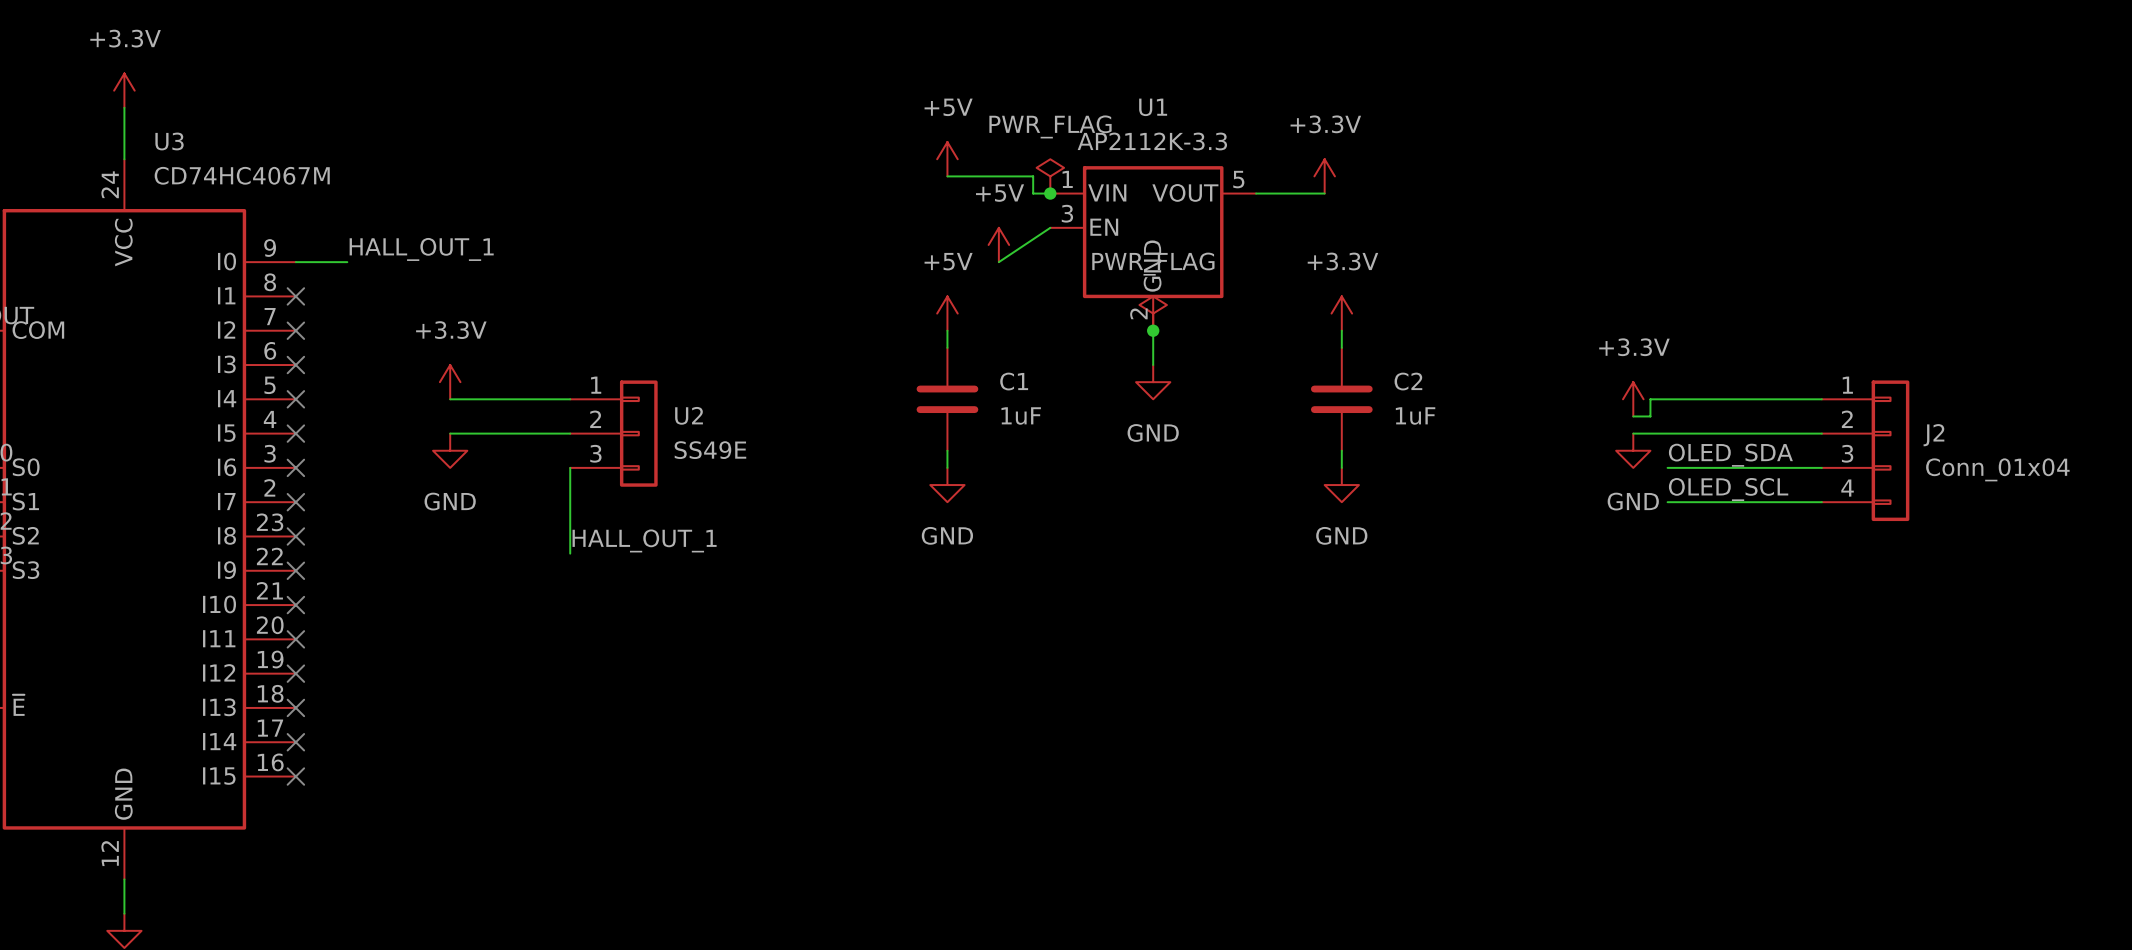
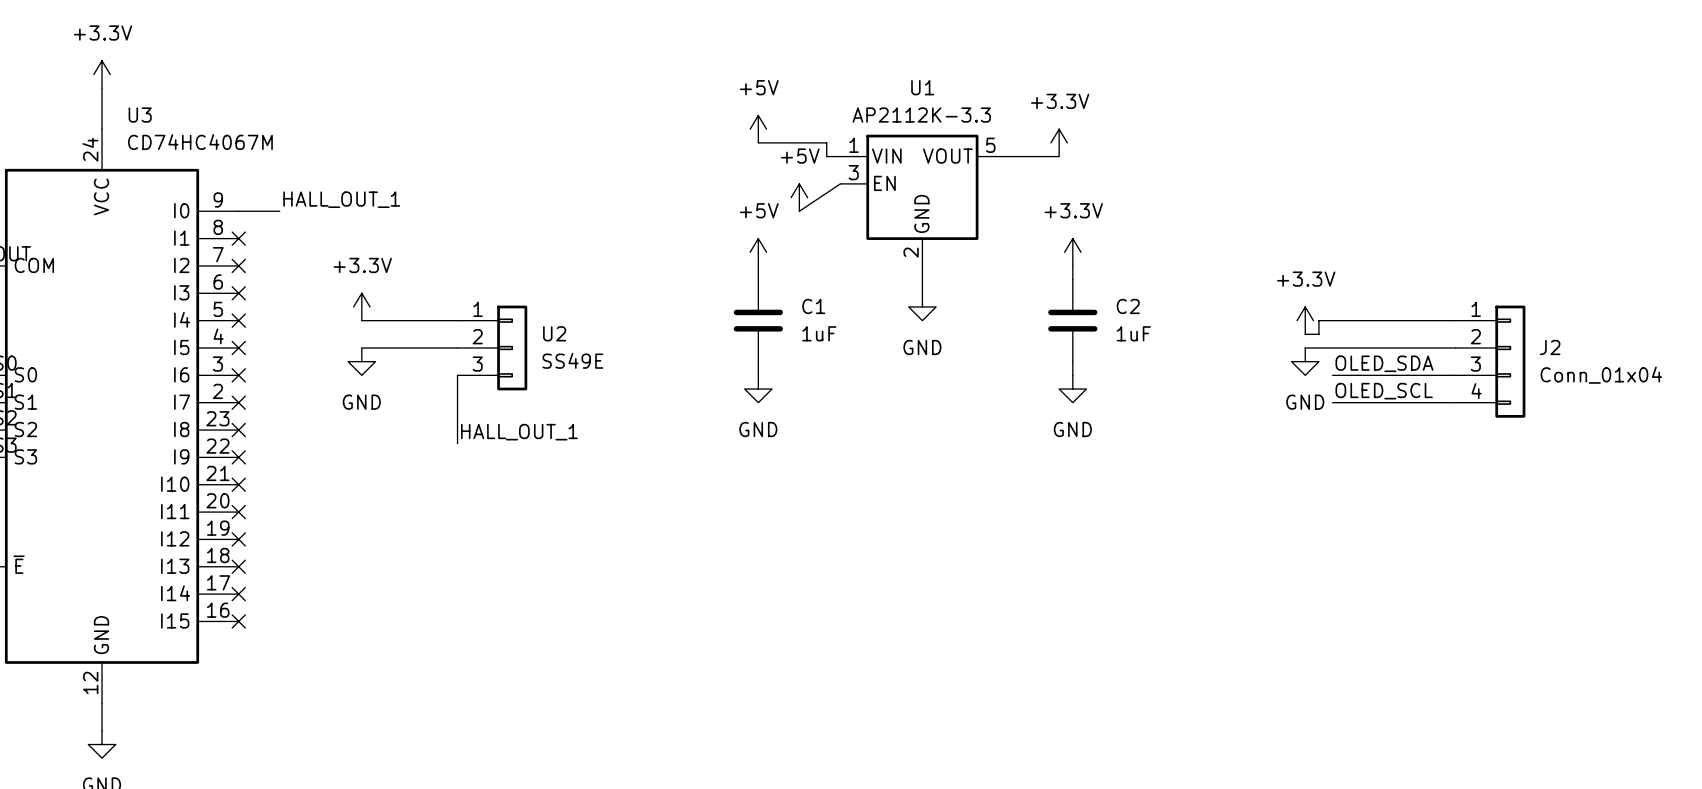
power symbol: PWR_FLAG (1050, 176) -> none
junction: (1050, 193) -> none
power symbol: PWR_FLAG (1153, 313) -> none
junction: (1153, 330) -> none

